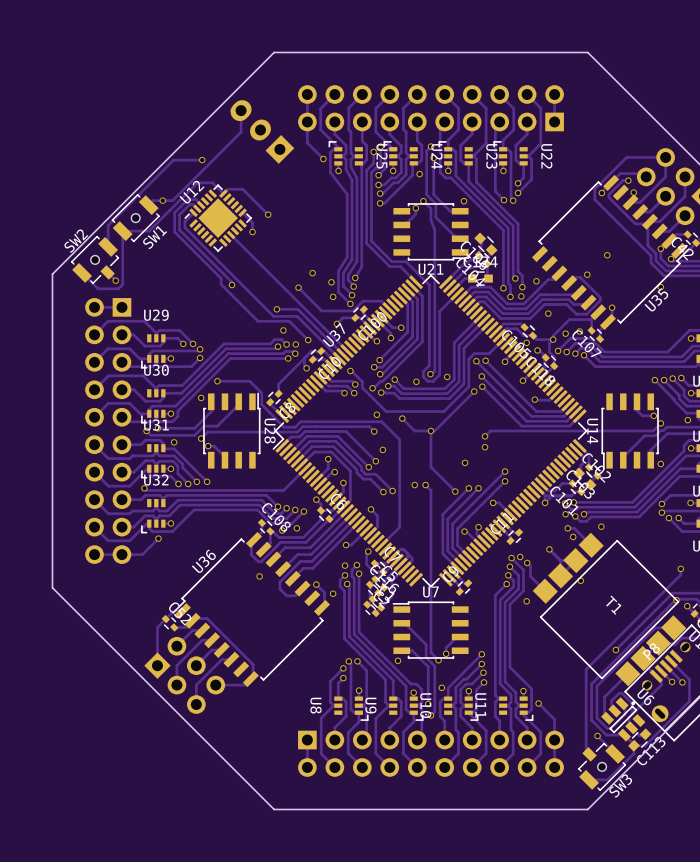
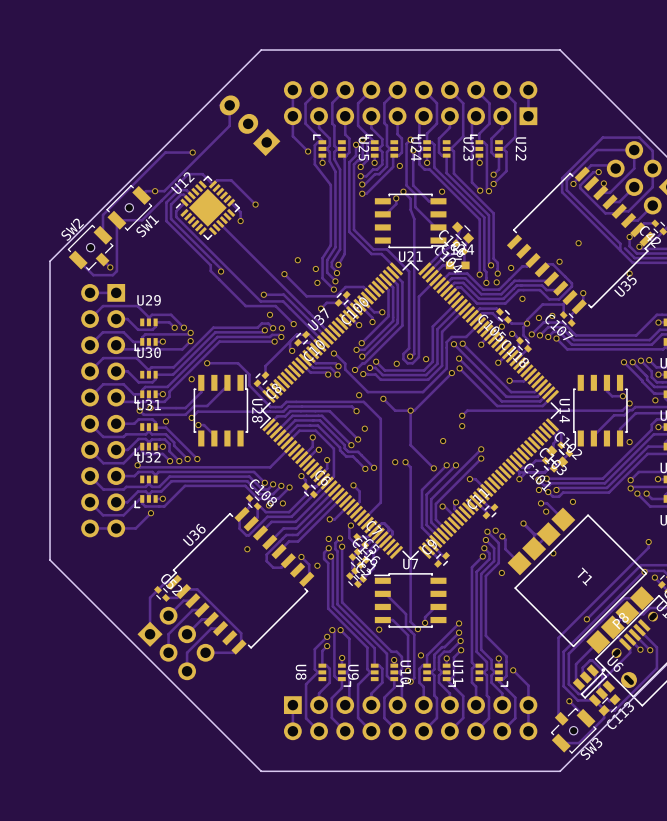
track: none -> (652, 168) (652, 150) (639, 137) (602, 137) (562, 178) (562, 192) (620, 250)
track: (647, 223) (647, 245) (655, 253) (655, 260) -> none

